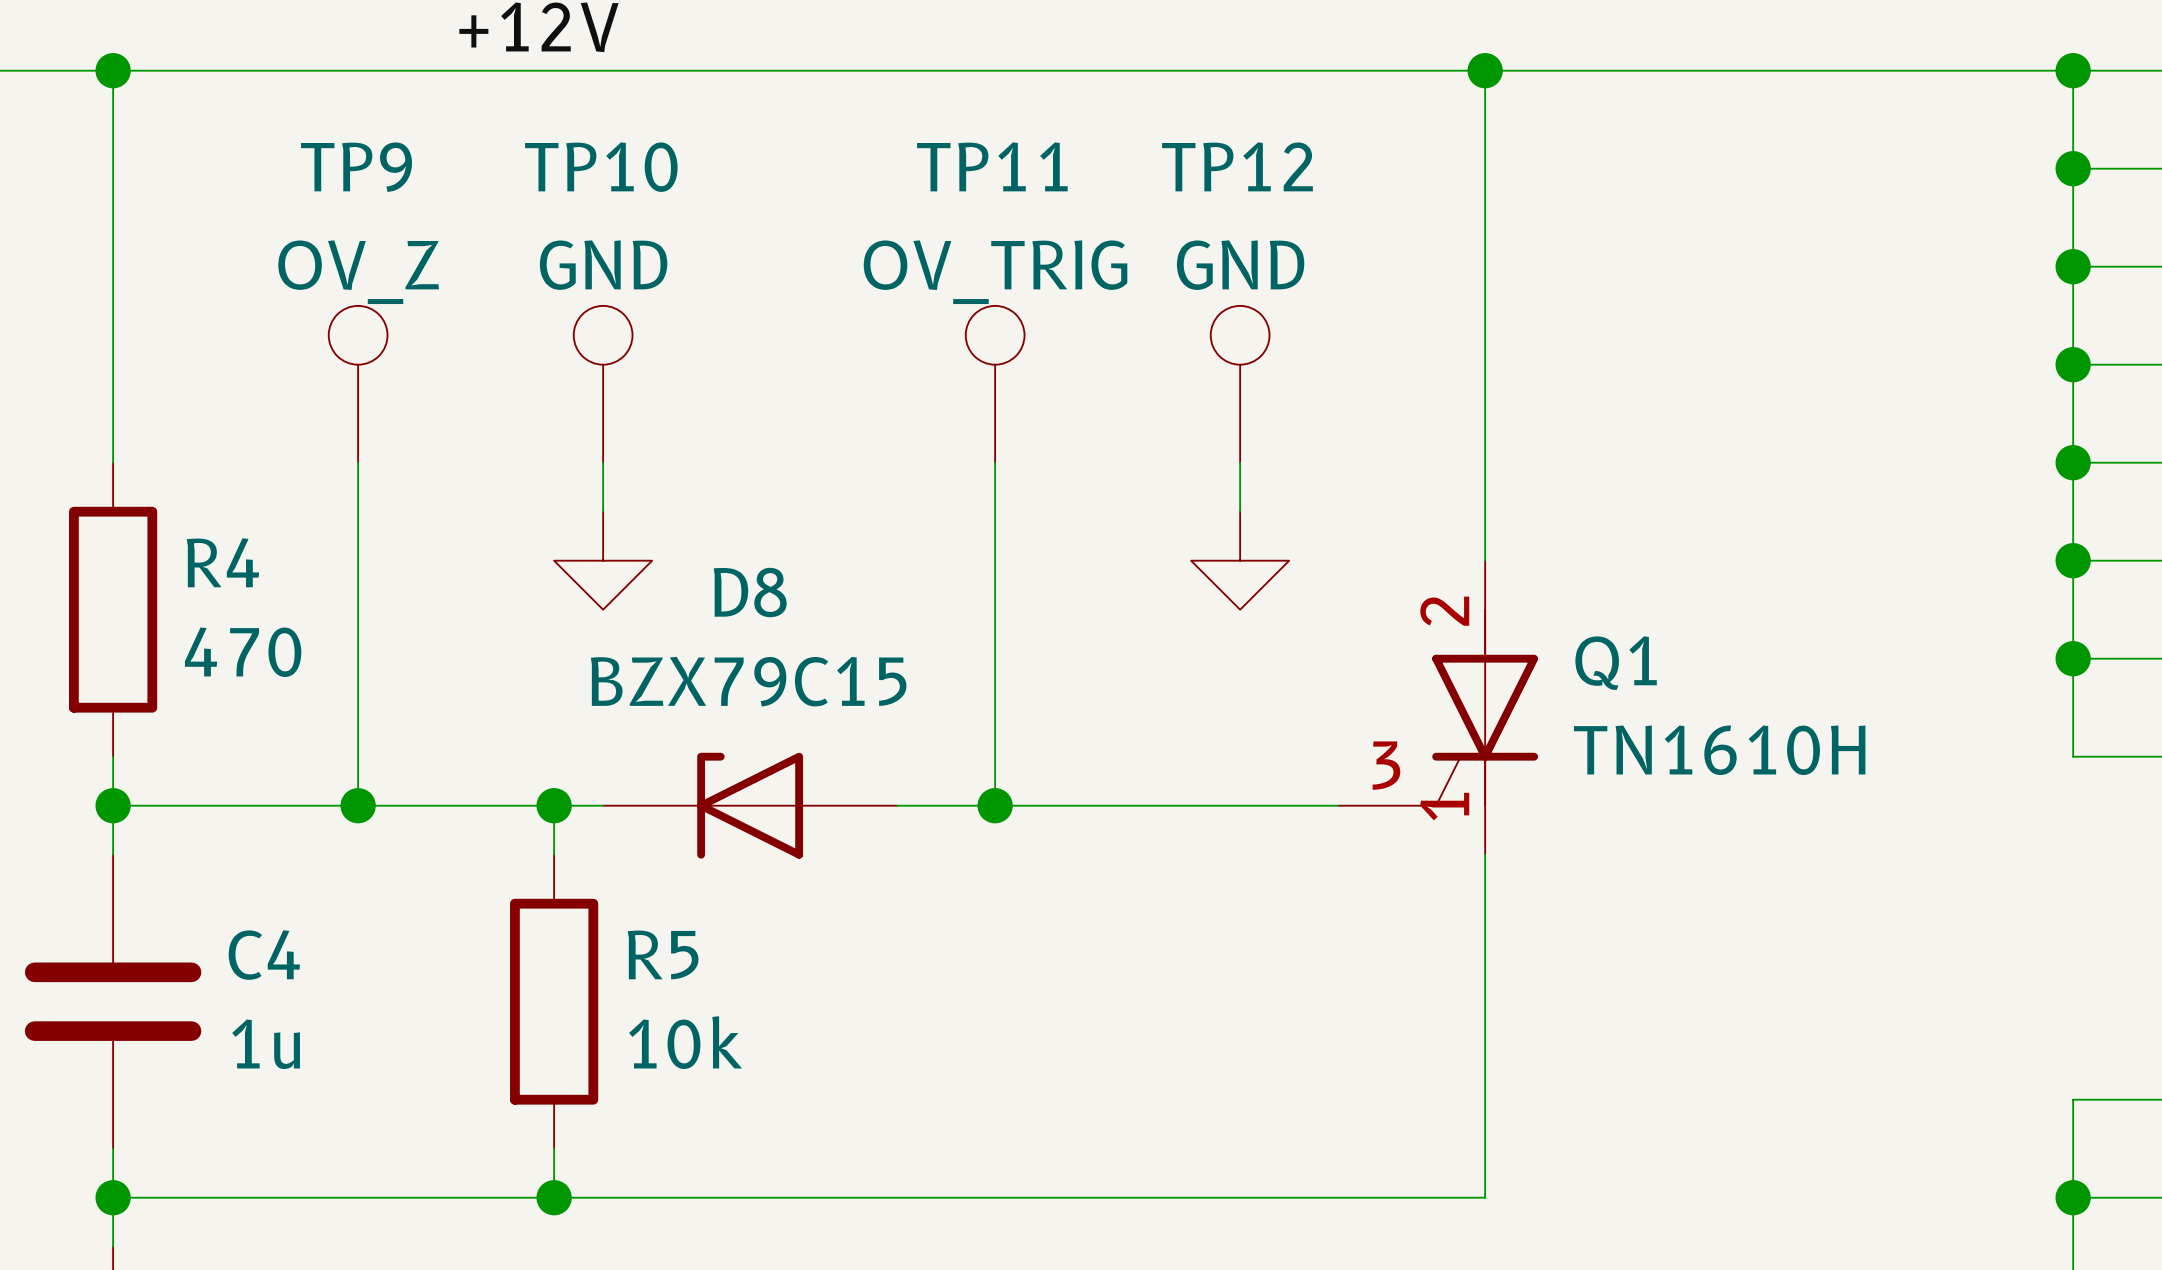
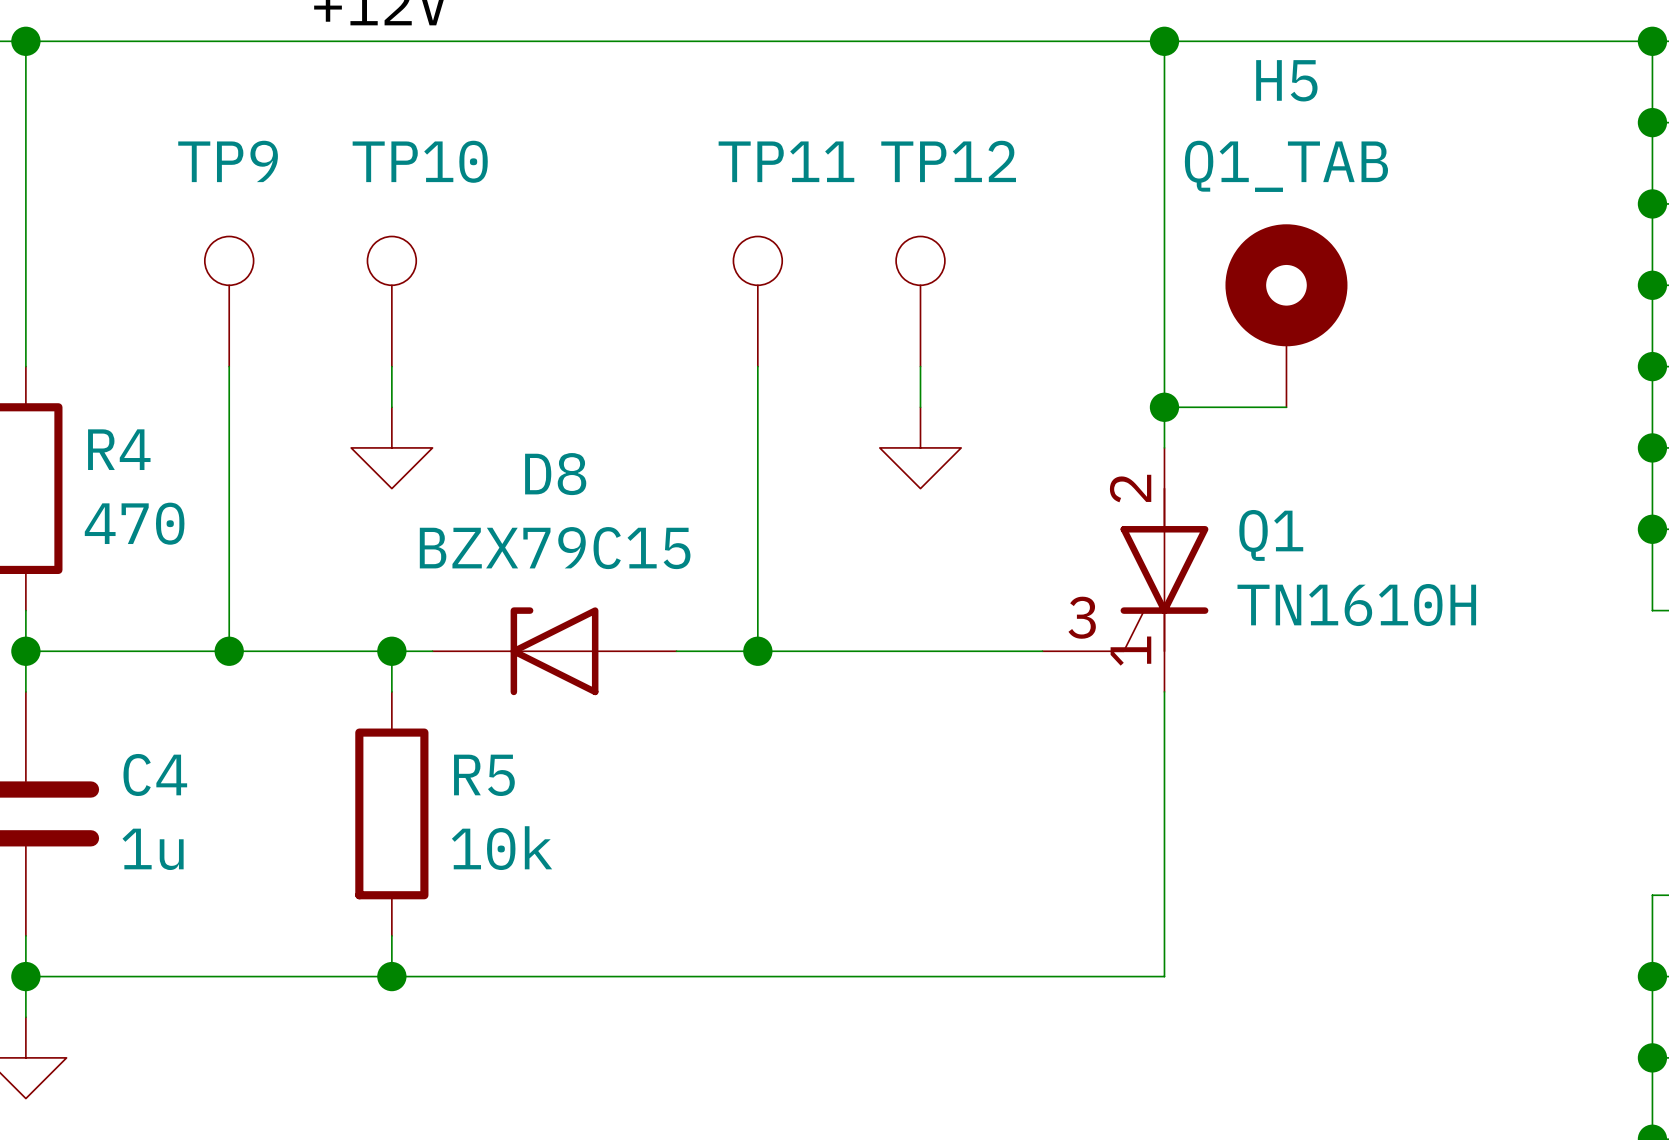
TP11 name position: TP11 (992, 166) -> TP11 (786, 161)
TP12 name position: TP12 (1237, 166) -> TP12 (948, 161)
TP9 name position: TP9 (356, 167) -> TP9 (228, 161)
TP10 name position: TP10 (601, 167) -> TP10 (420, 161)
TP10 value: GND (603, 265) -> none
TP12 value: GND (1240, 265) -> none
TP9 value: OV_Z (358, 272) -> none
TP11 value: OV_TRIG (995, 272) -> none
TP10 position: (603, 384) -> (391, 301)
TP12 position: (1240, 384) -> (920, 301)
H5: none -> Q1_TAB (1286, 315)
wire: (603, 462) (603, 511) -> (391, 366) (391, 407)
wire: (1240, 462) (1240, 511) -> (920, 366) (920, 407)
wire: none -> (1164, 407) (1286, 407)
junction: none -> (1164, 407)
power symbol position: (603, 560) -> (391, 447)
power symbol position: (1240, 560) -> (920, 447)

